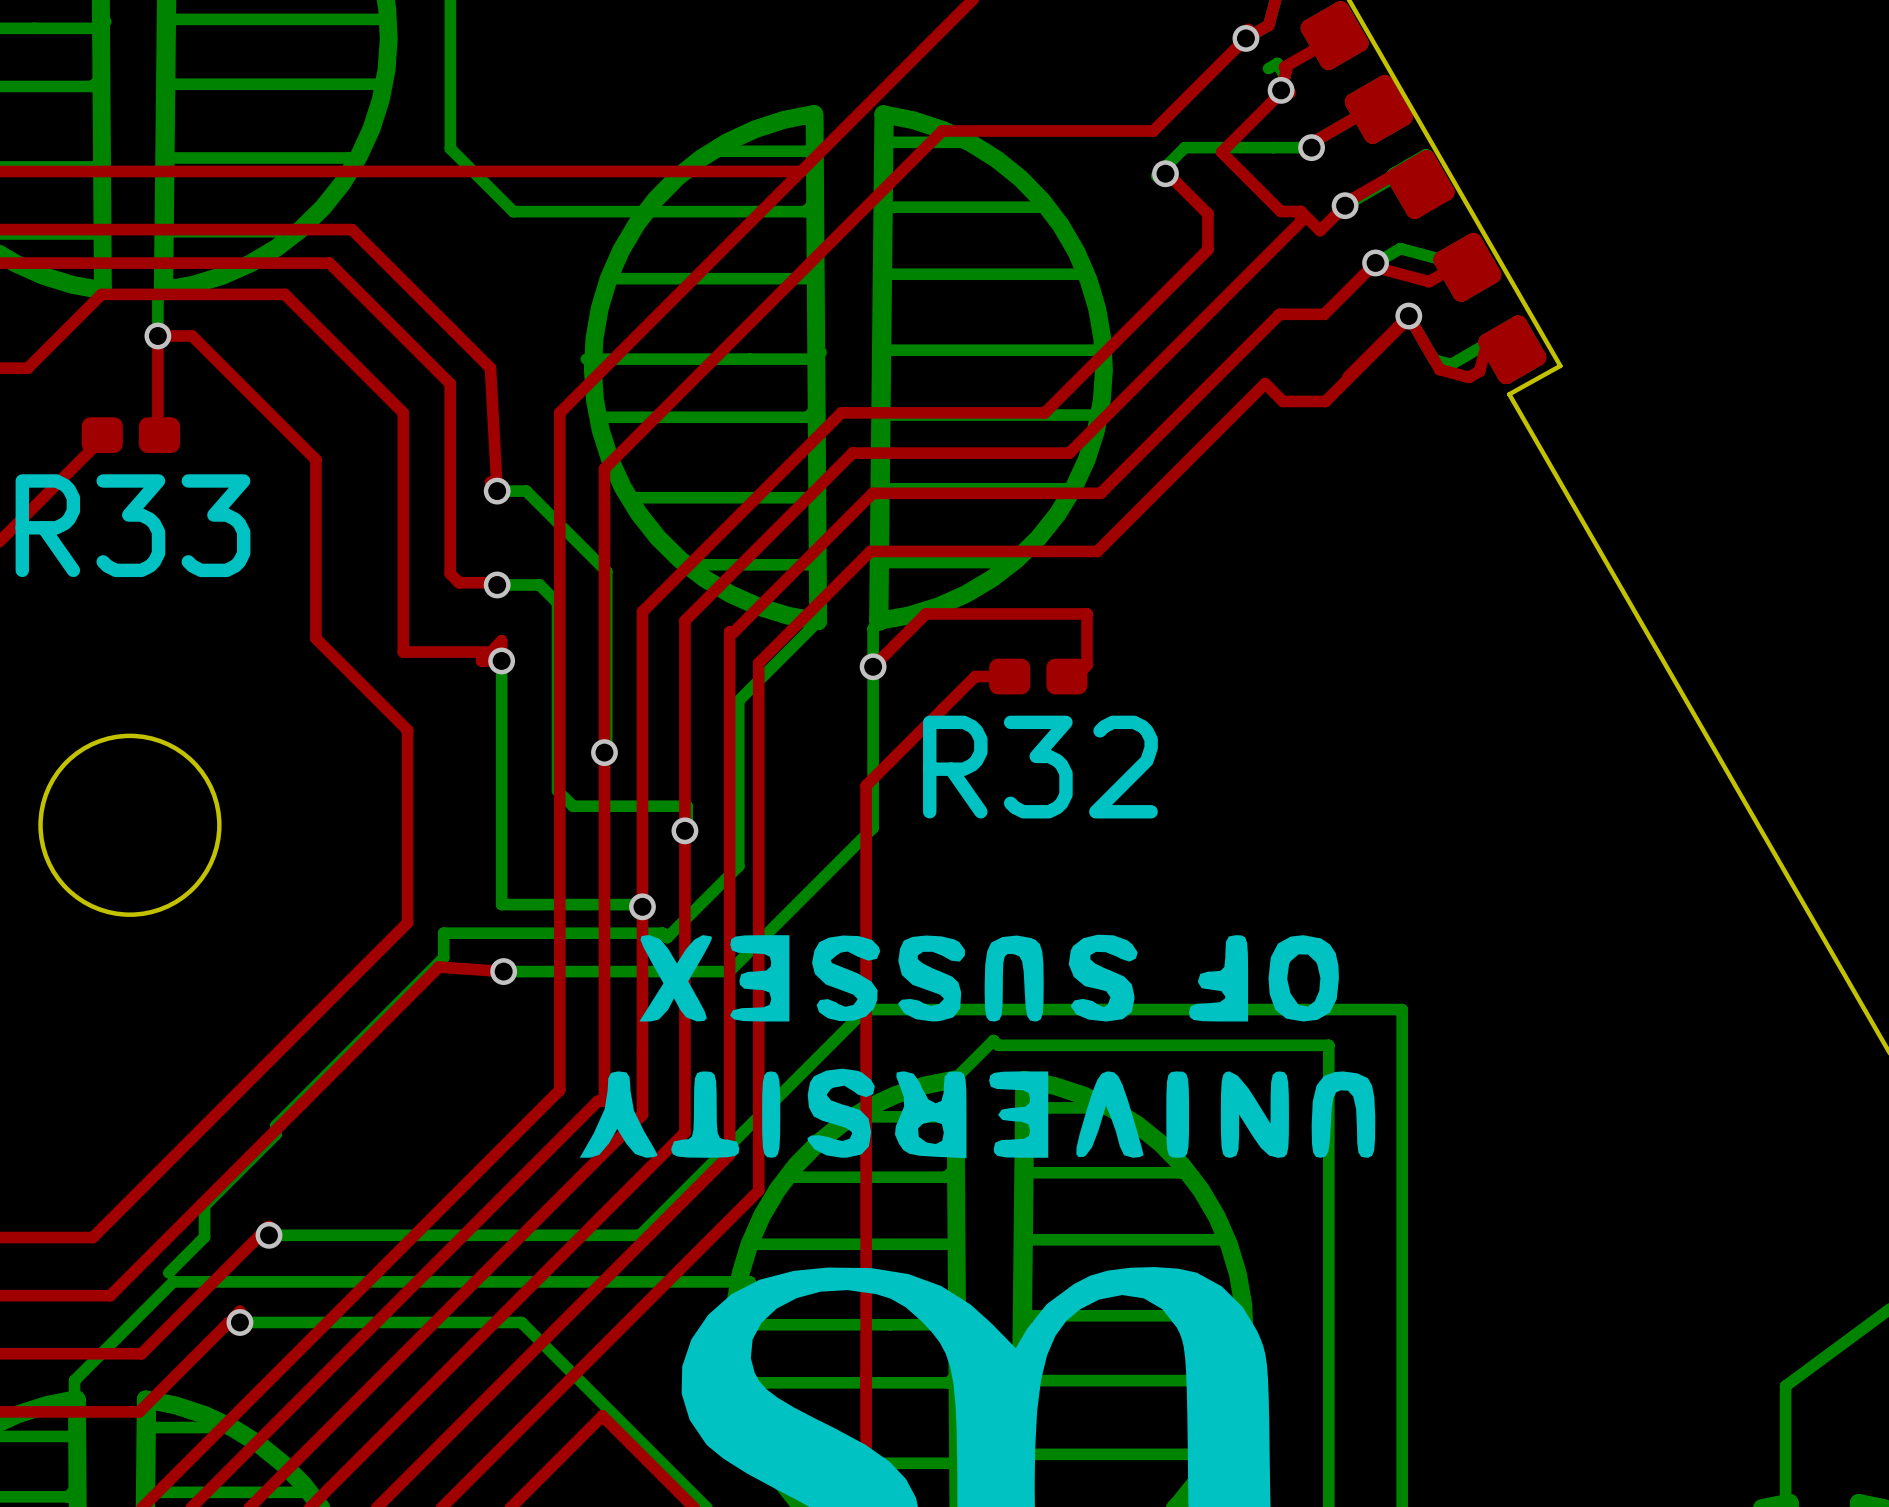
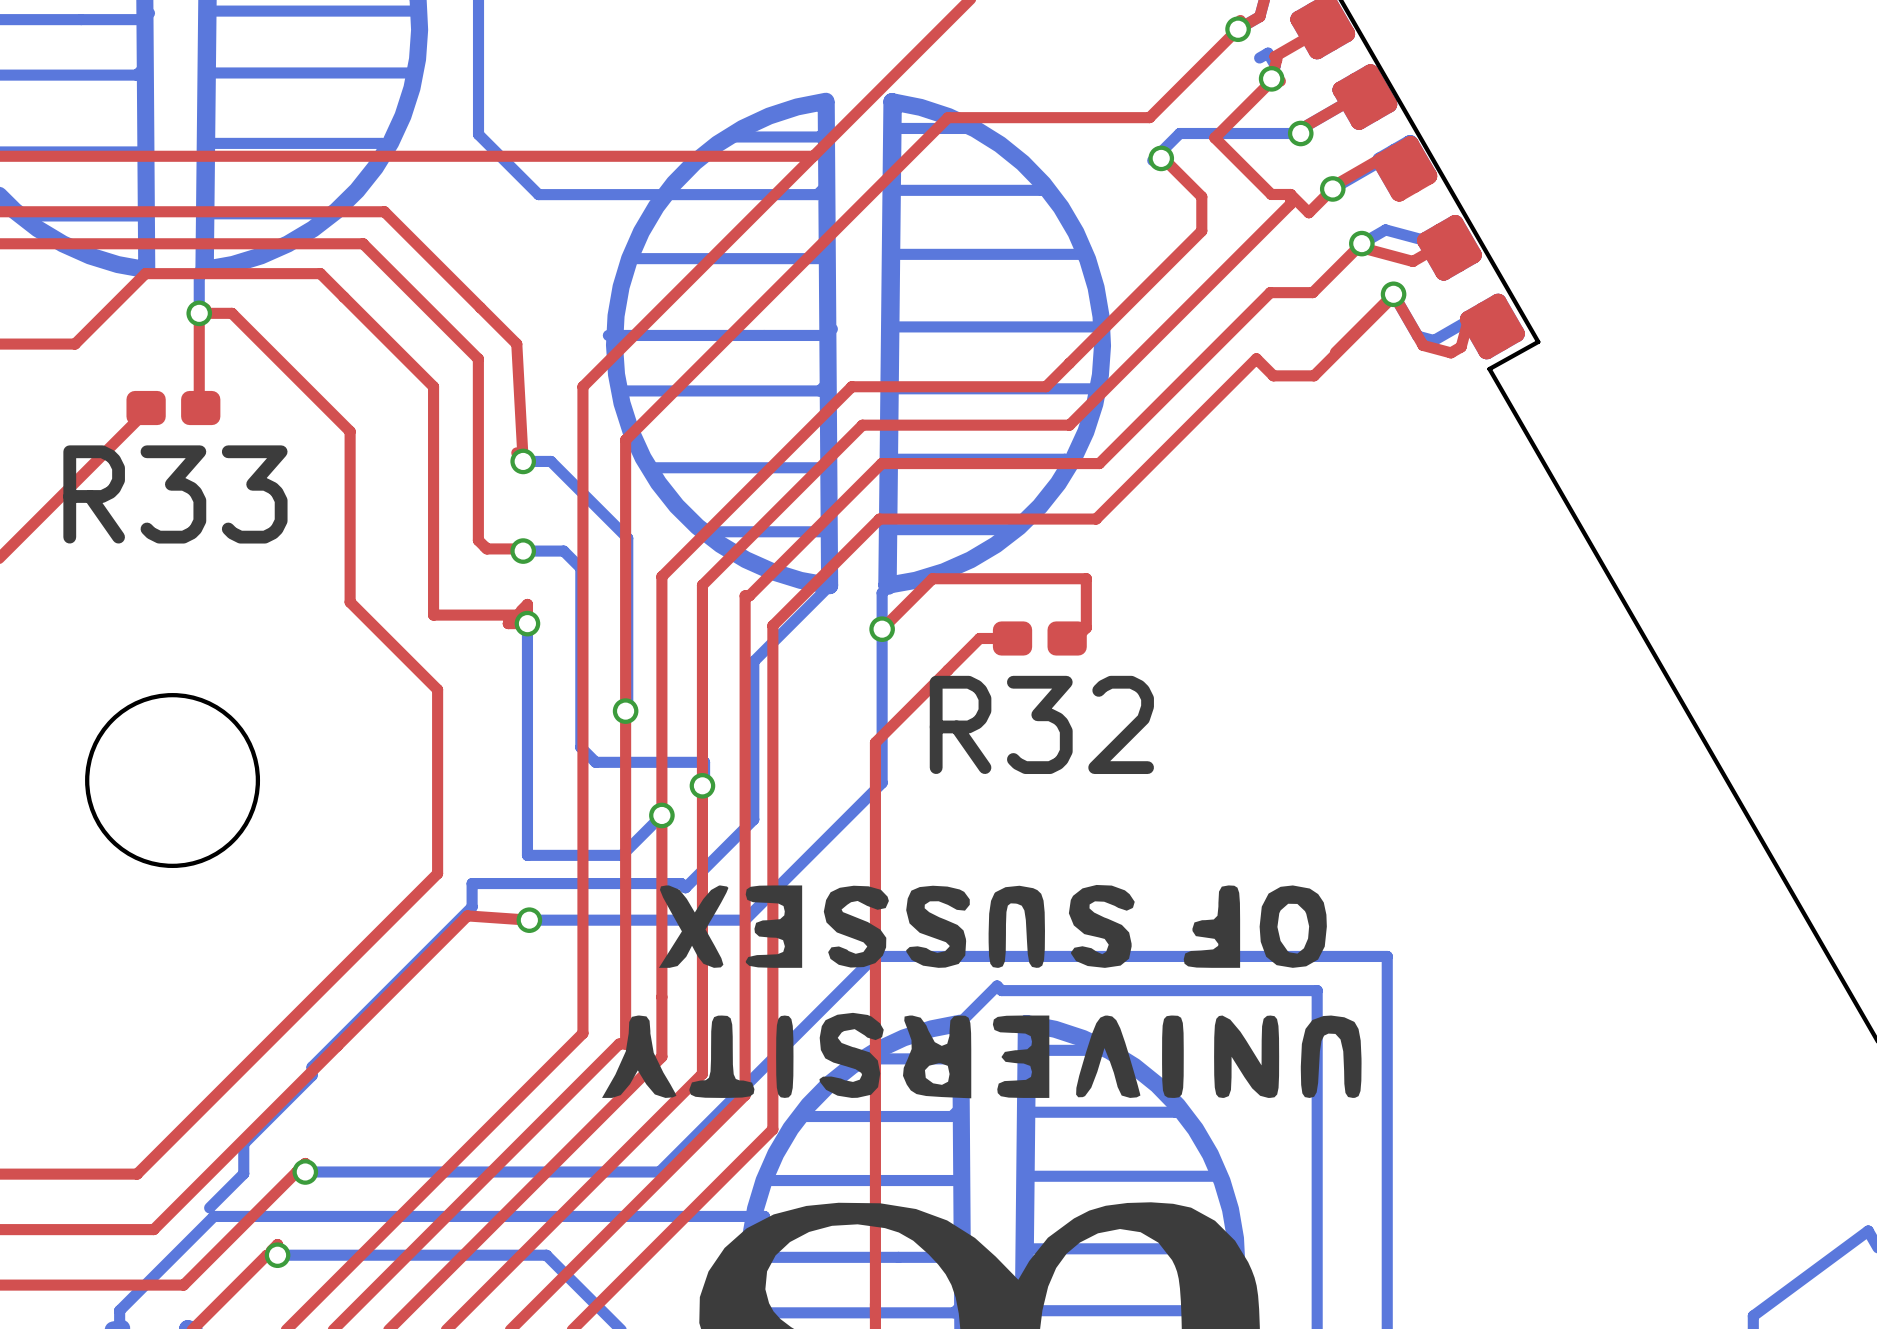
bottom track: (501, 904) (640, 904) (642, 906) -> (527, 855) (621, 855) (661, 815)
via position: (642, 906) -> (661, 815)

